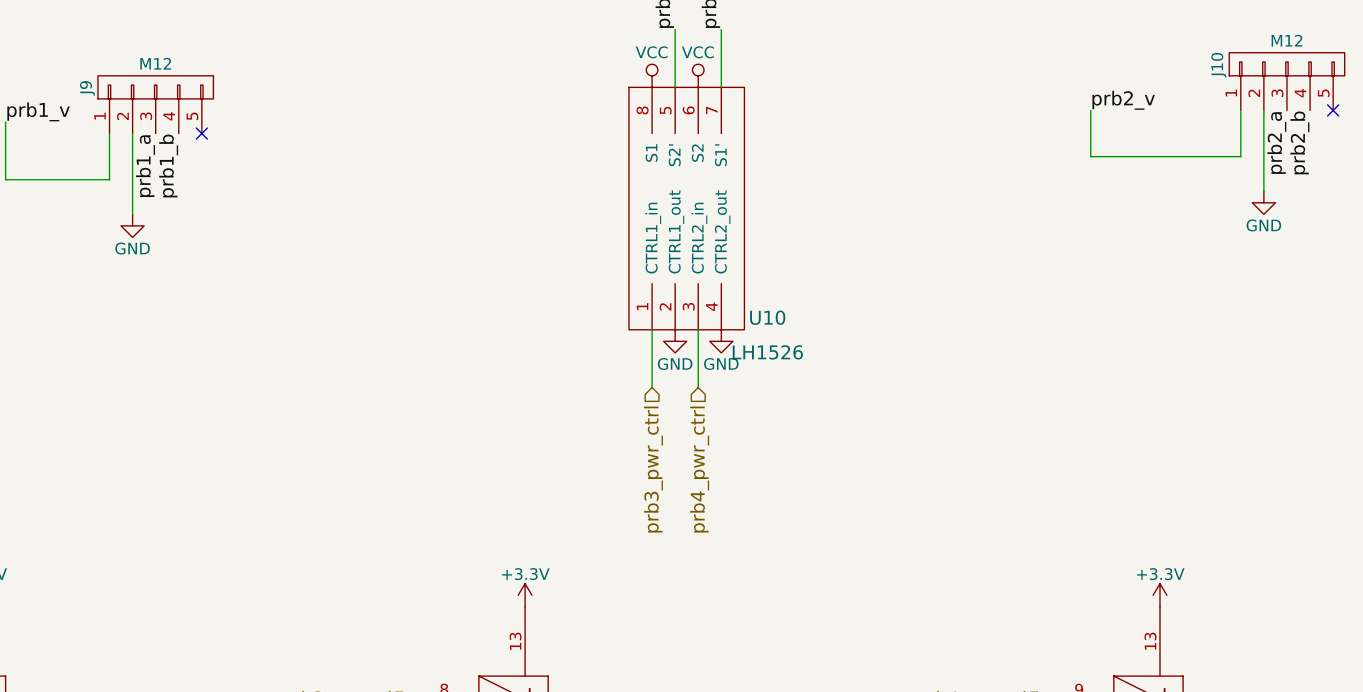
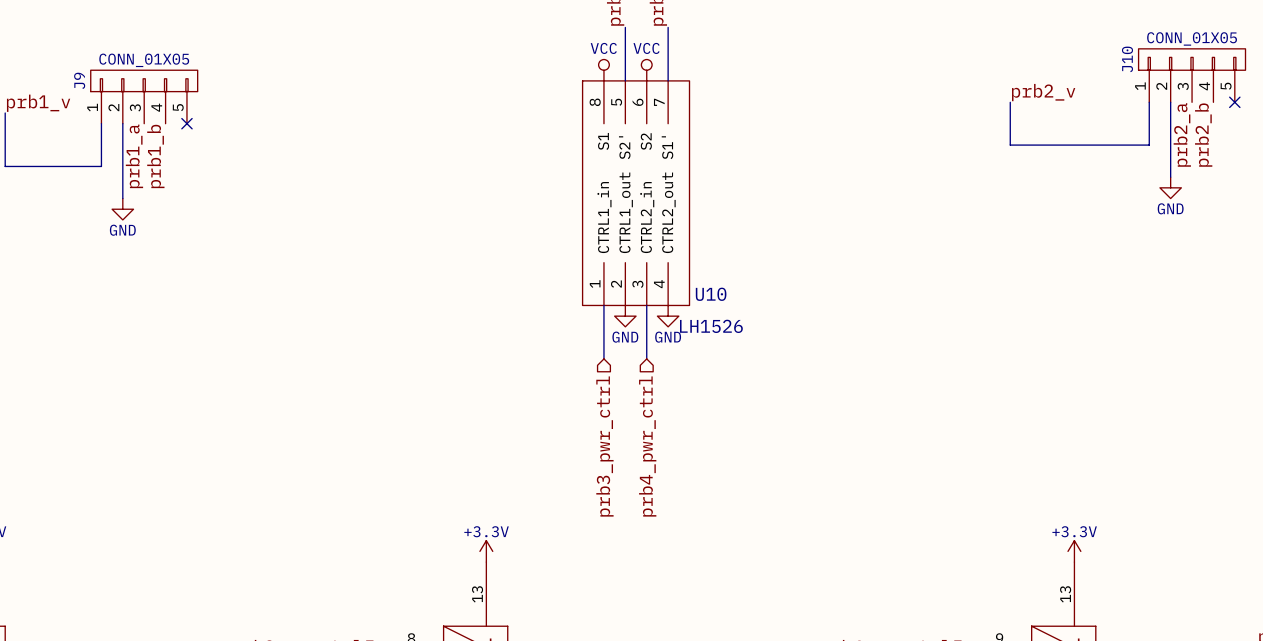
J10 value: M12 (1286, 40) -> CONN_01X05 (1192, 38)
J9 value: M12 (155, 63) -> CONN_01X05 (144, 60)

